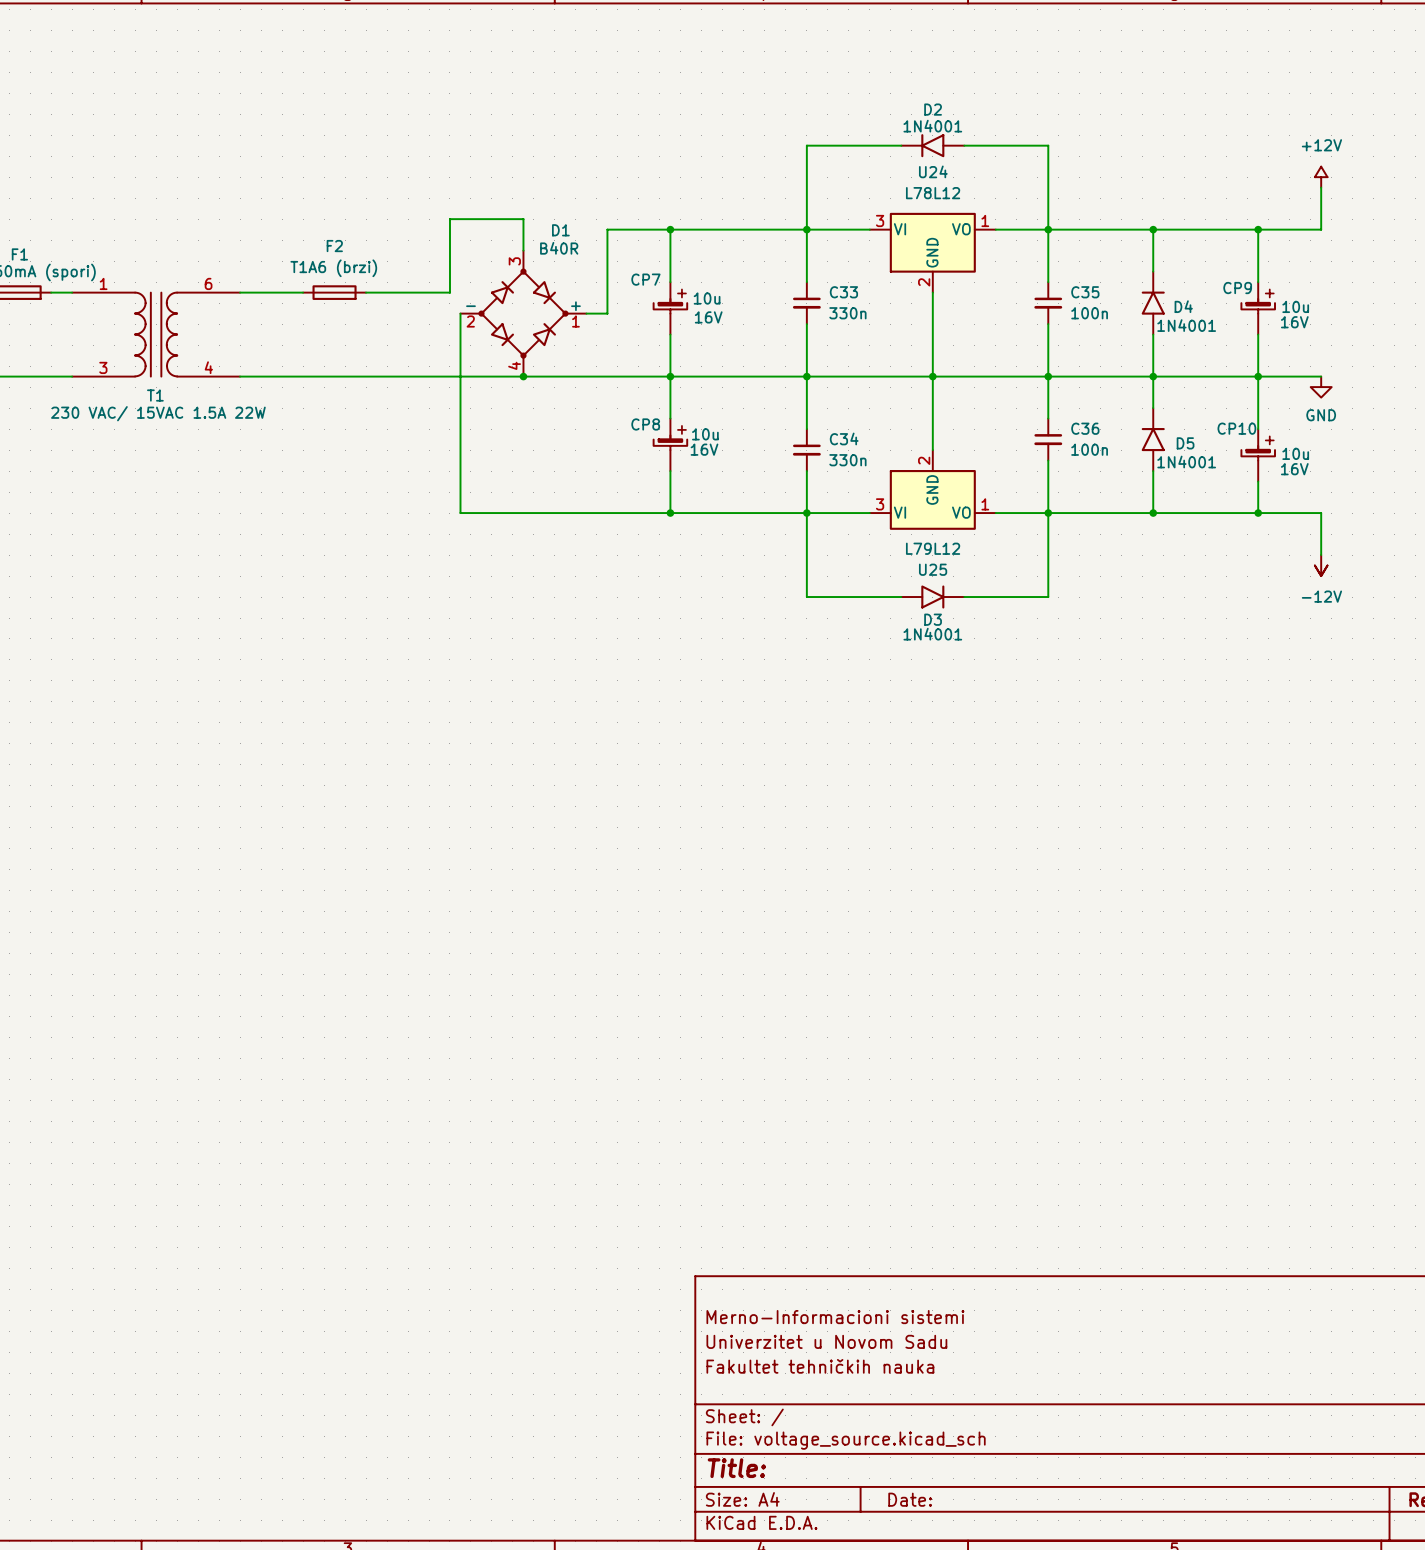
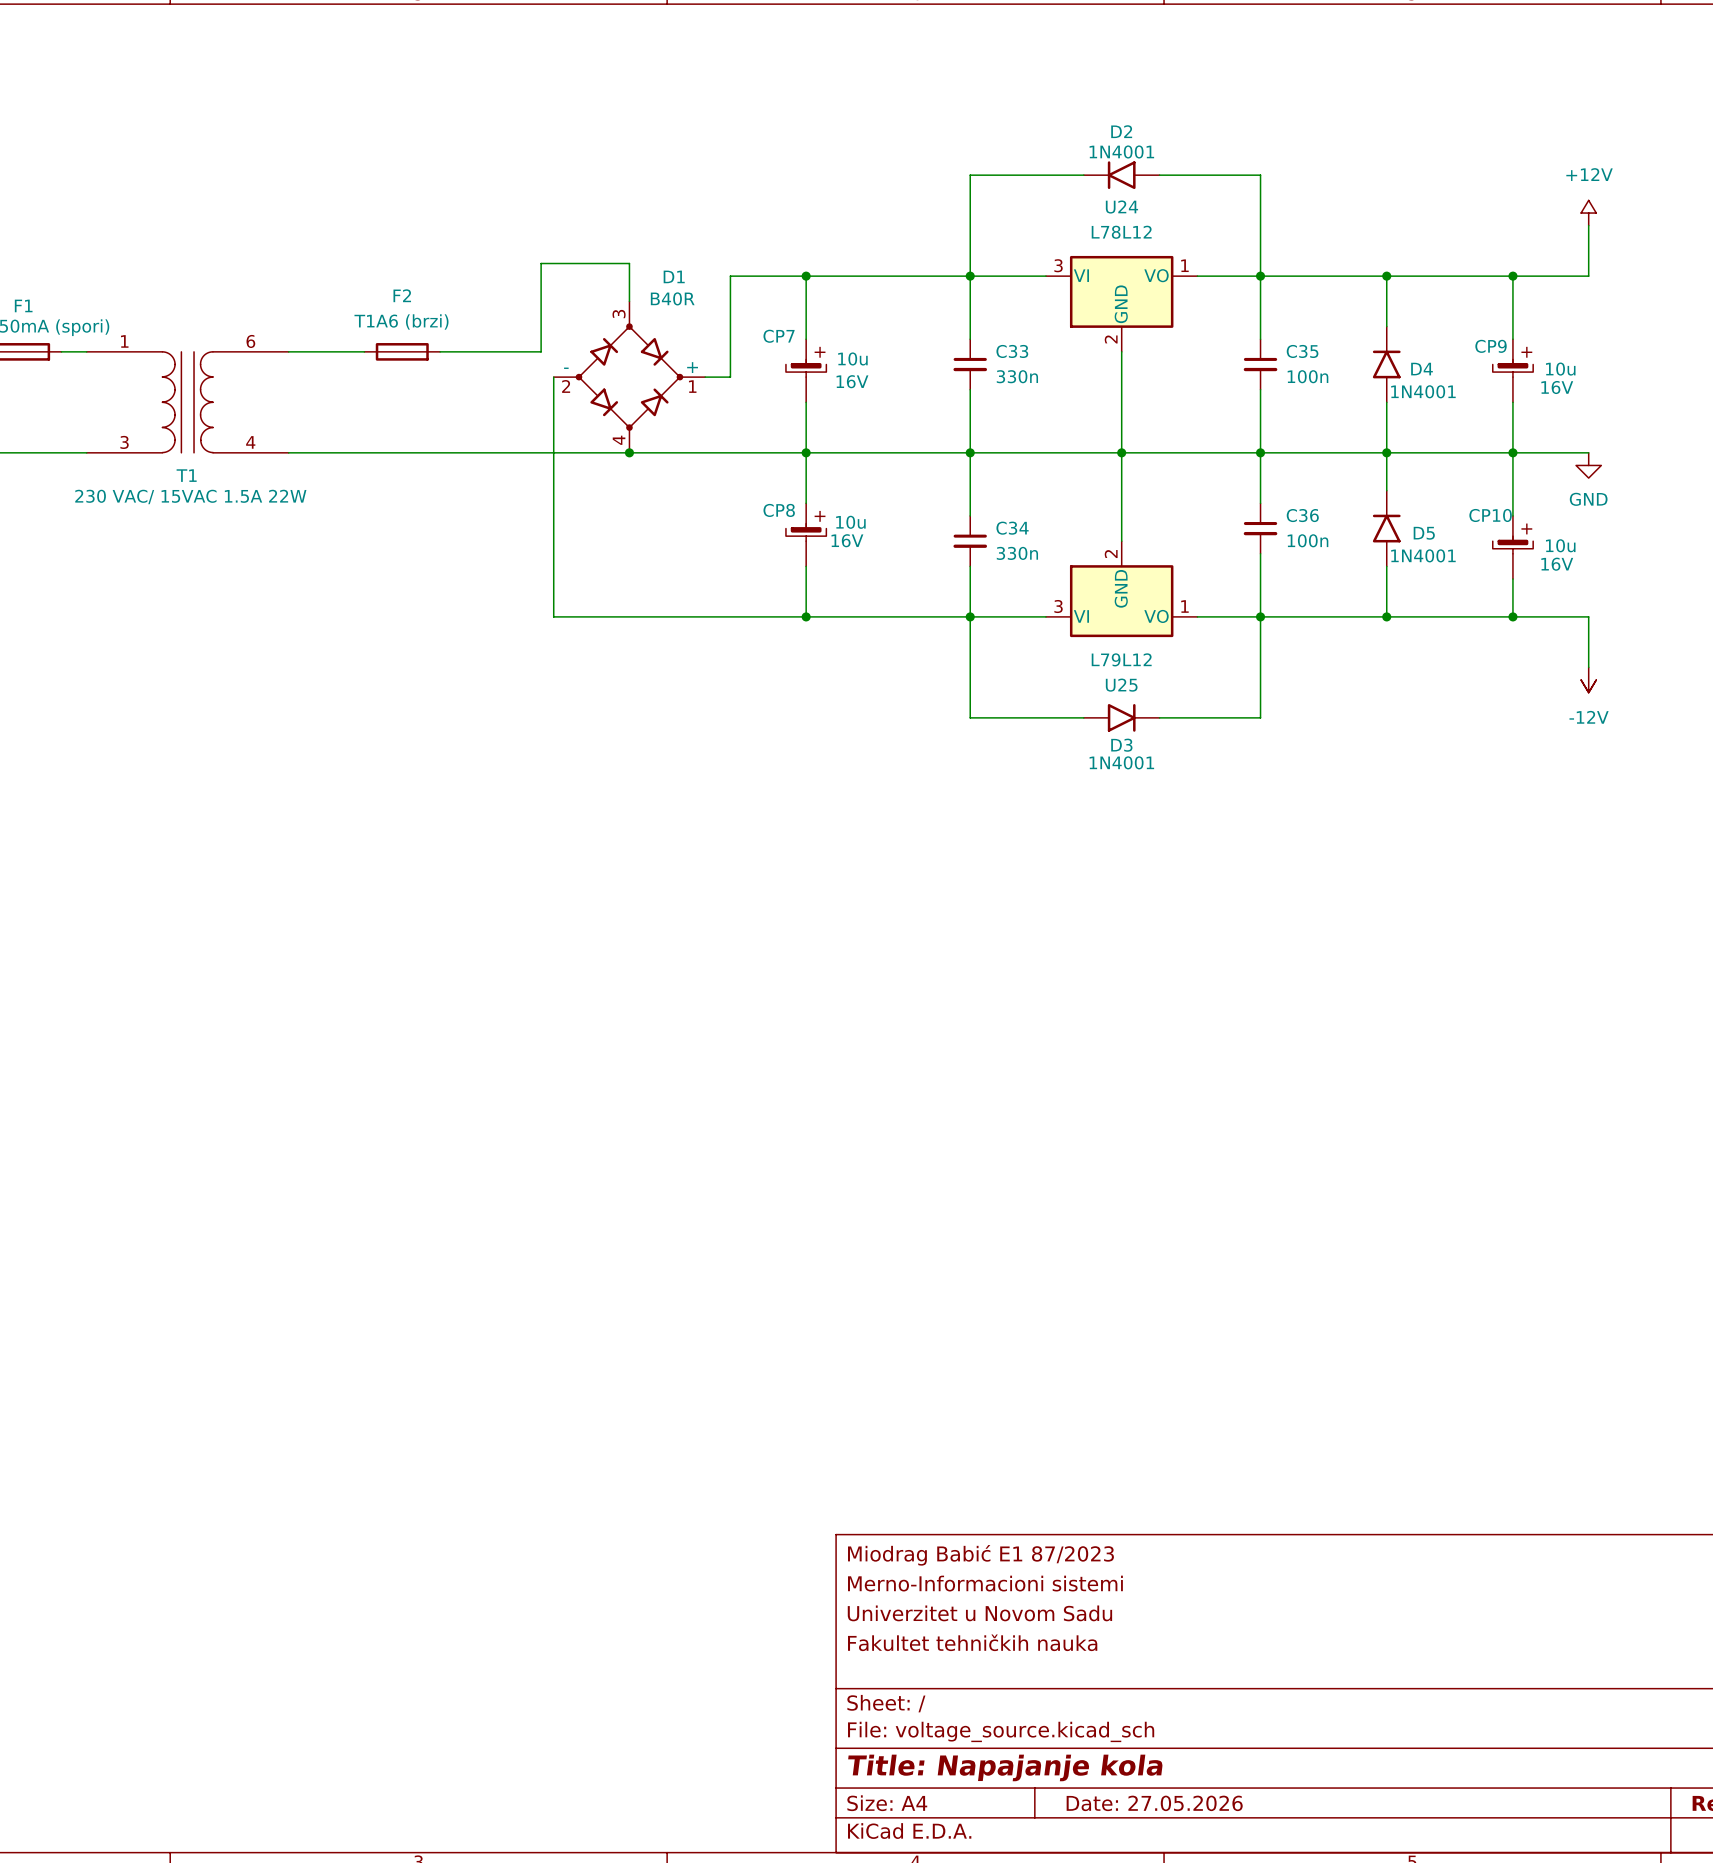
title block: none -> Miodrag Babić E1 87/2023 (980, 1555)
title block: Title: (736, 1468) -> Title: Napajanje kola (1005, 1767)
title block: Date: (910, 1499) -> Date: 27.05.2026 (1154, 1803)

